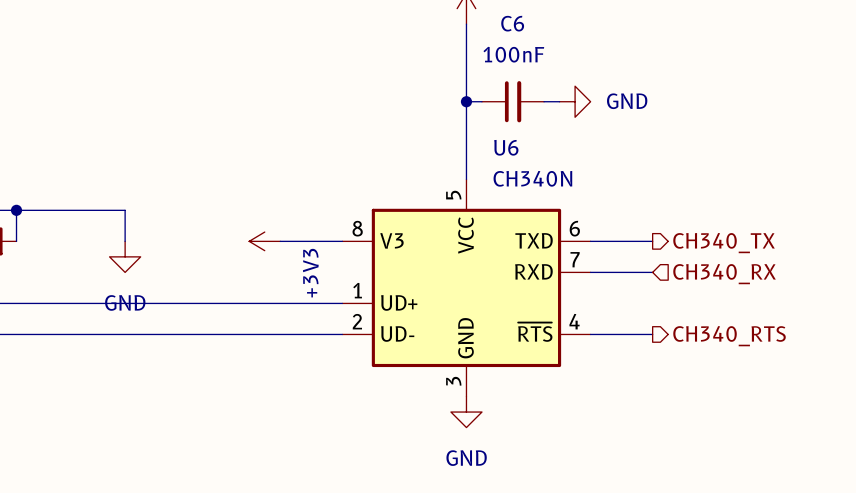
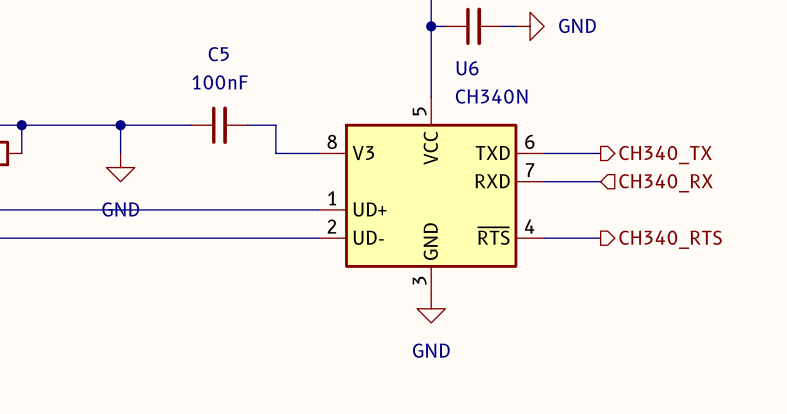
wire: none -> (120, 125) (191, 125)
junction: none -> (120, 125)
C5: none -> 100nF (219, 125)
power symbol: +3V3 (264, 241) -> none
wire: (280, 241) (295, 241) -> (247, 125) (275, 125) (275, 153)

